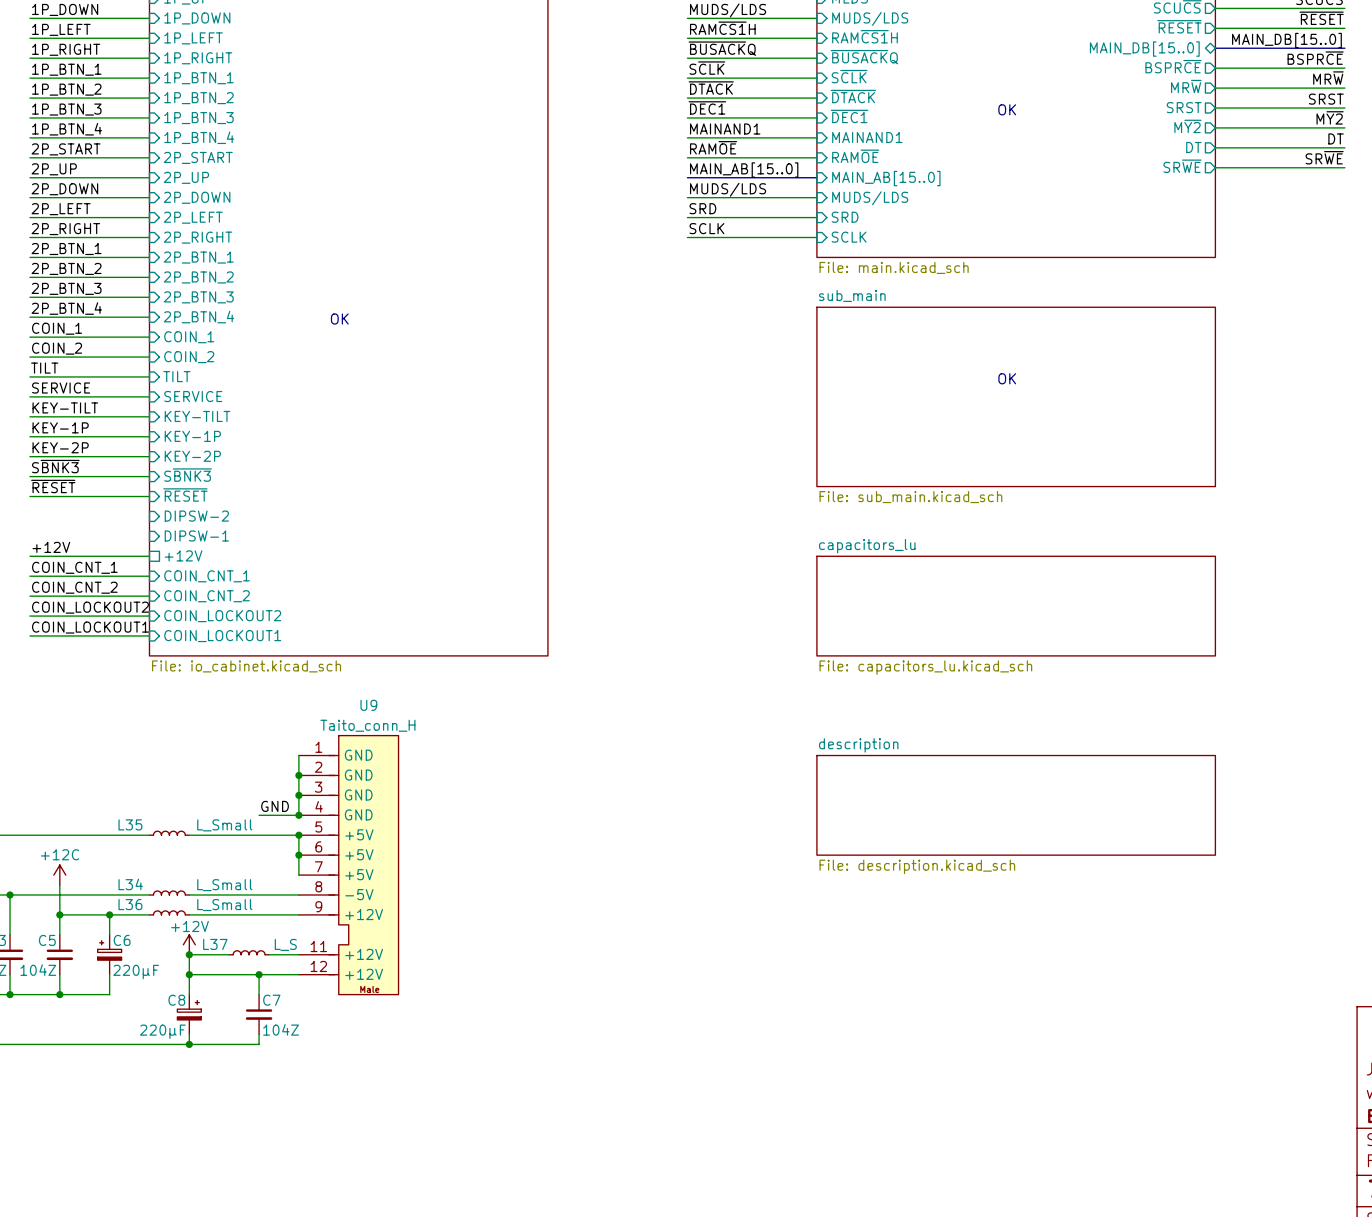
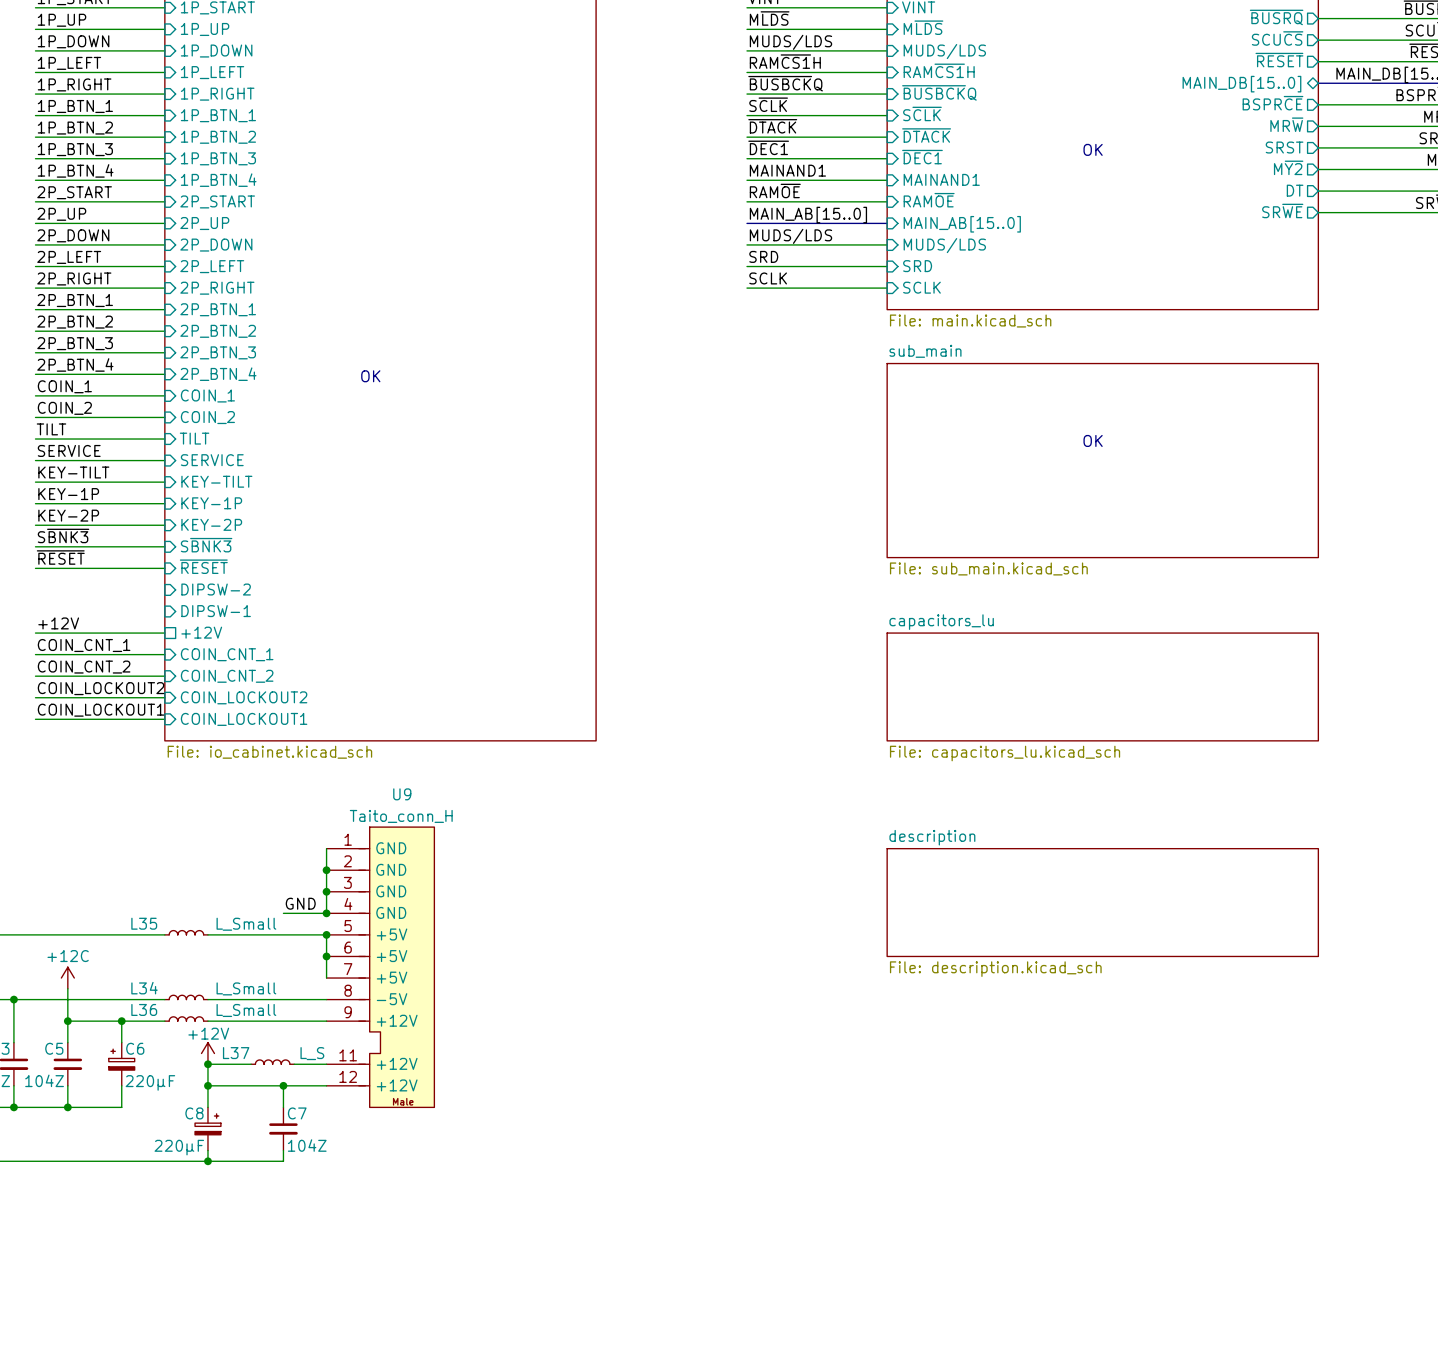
label: ~{BUSACK}Q (722, 48) -> ~{BUSBCK}Q (785, 83)
sheet pin: ~{BUSACK}Q (864, 57) -> ~{BUSBCK}Q (939, 92)

